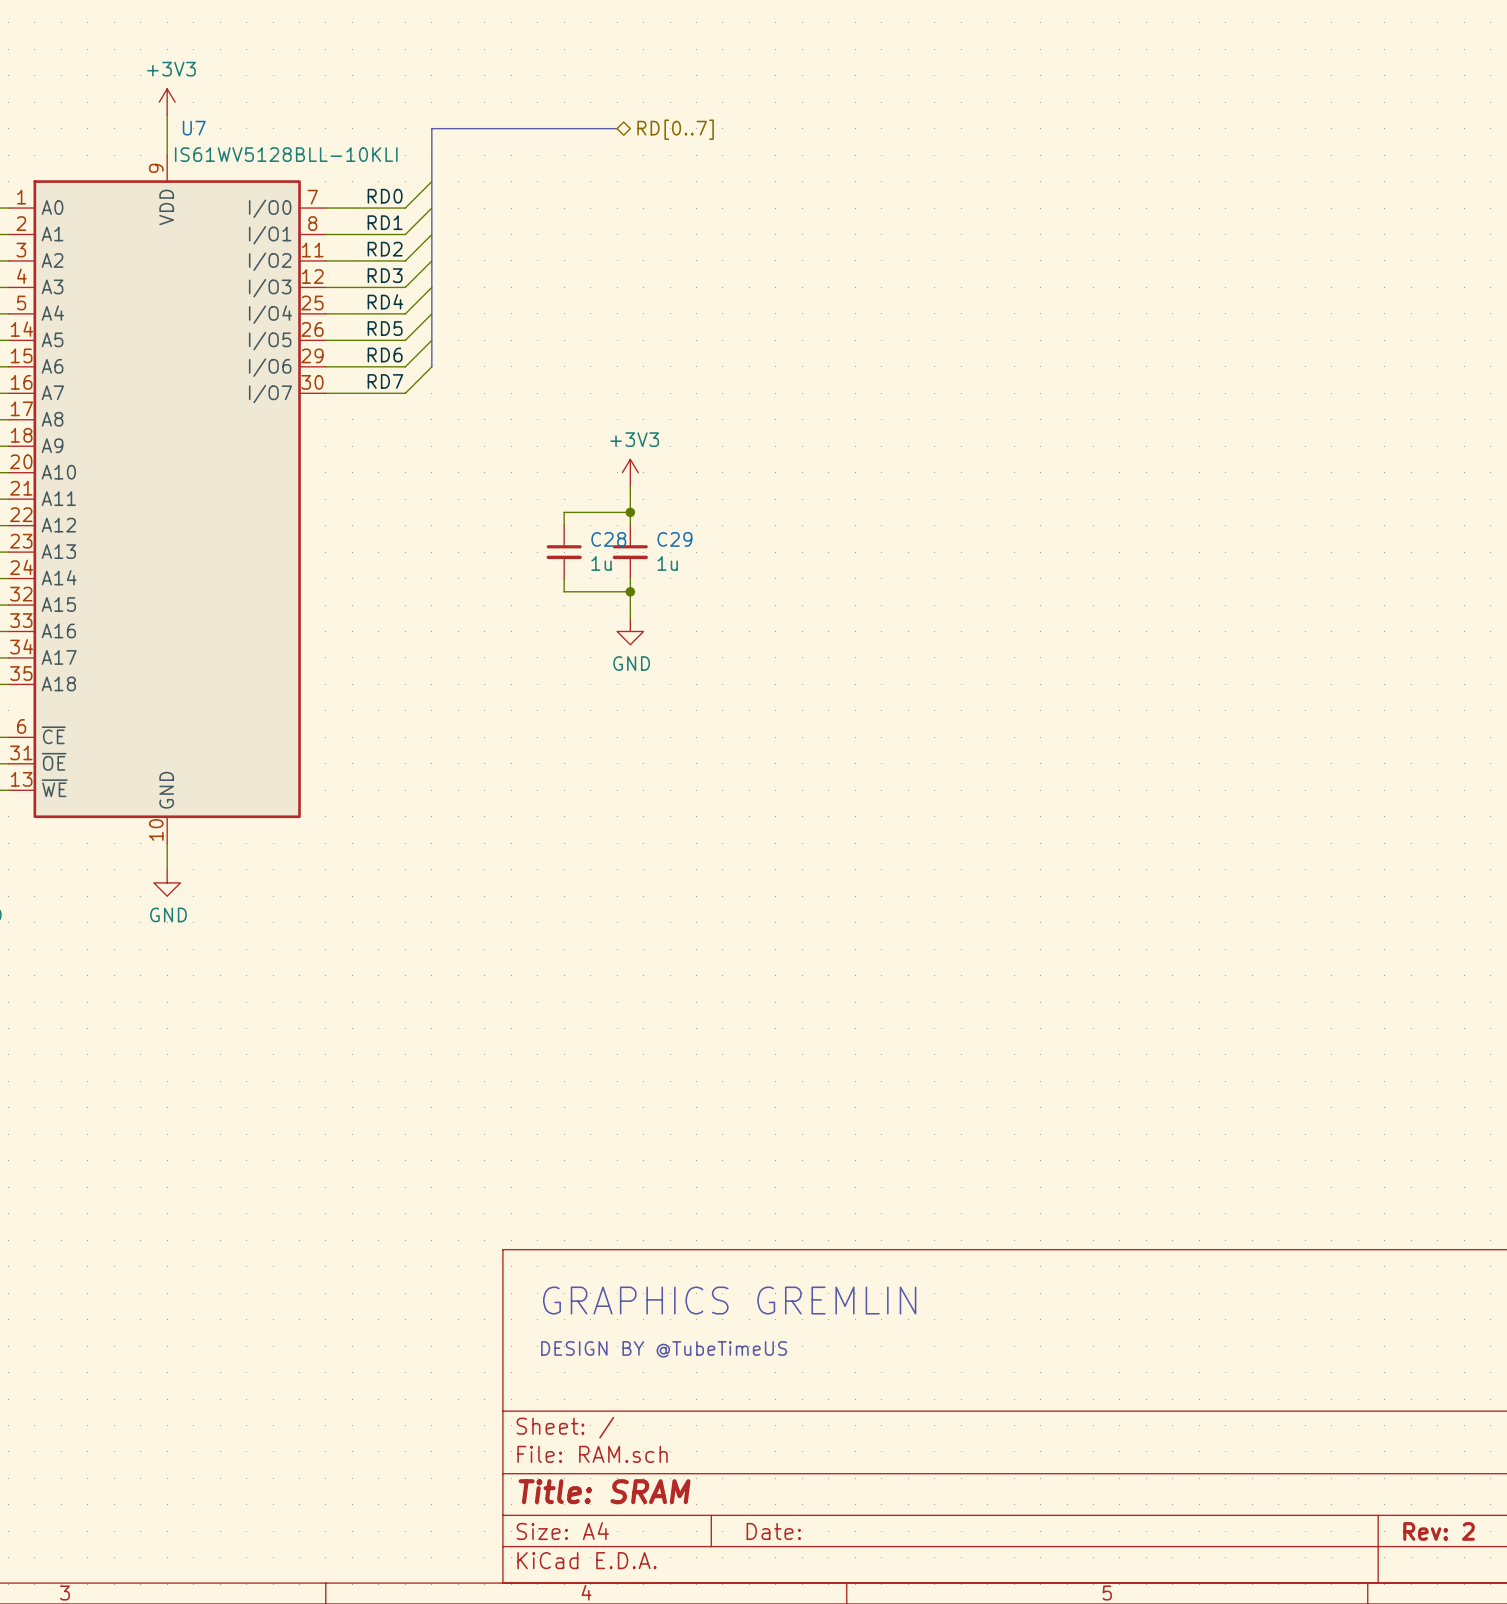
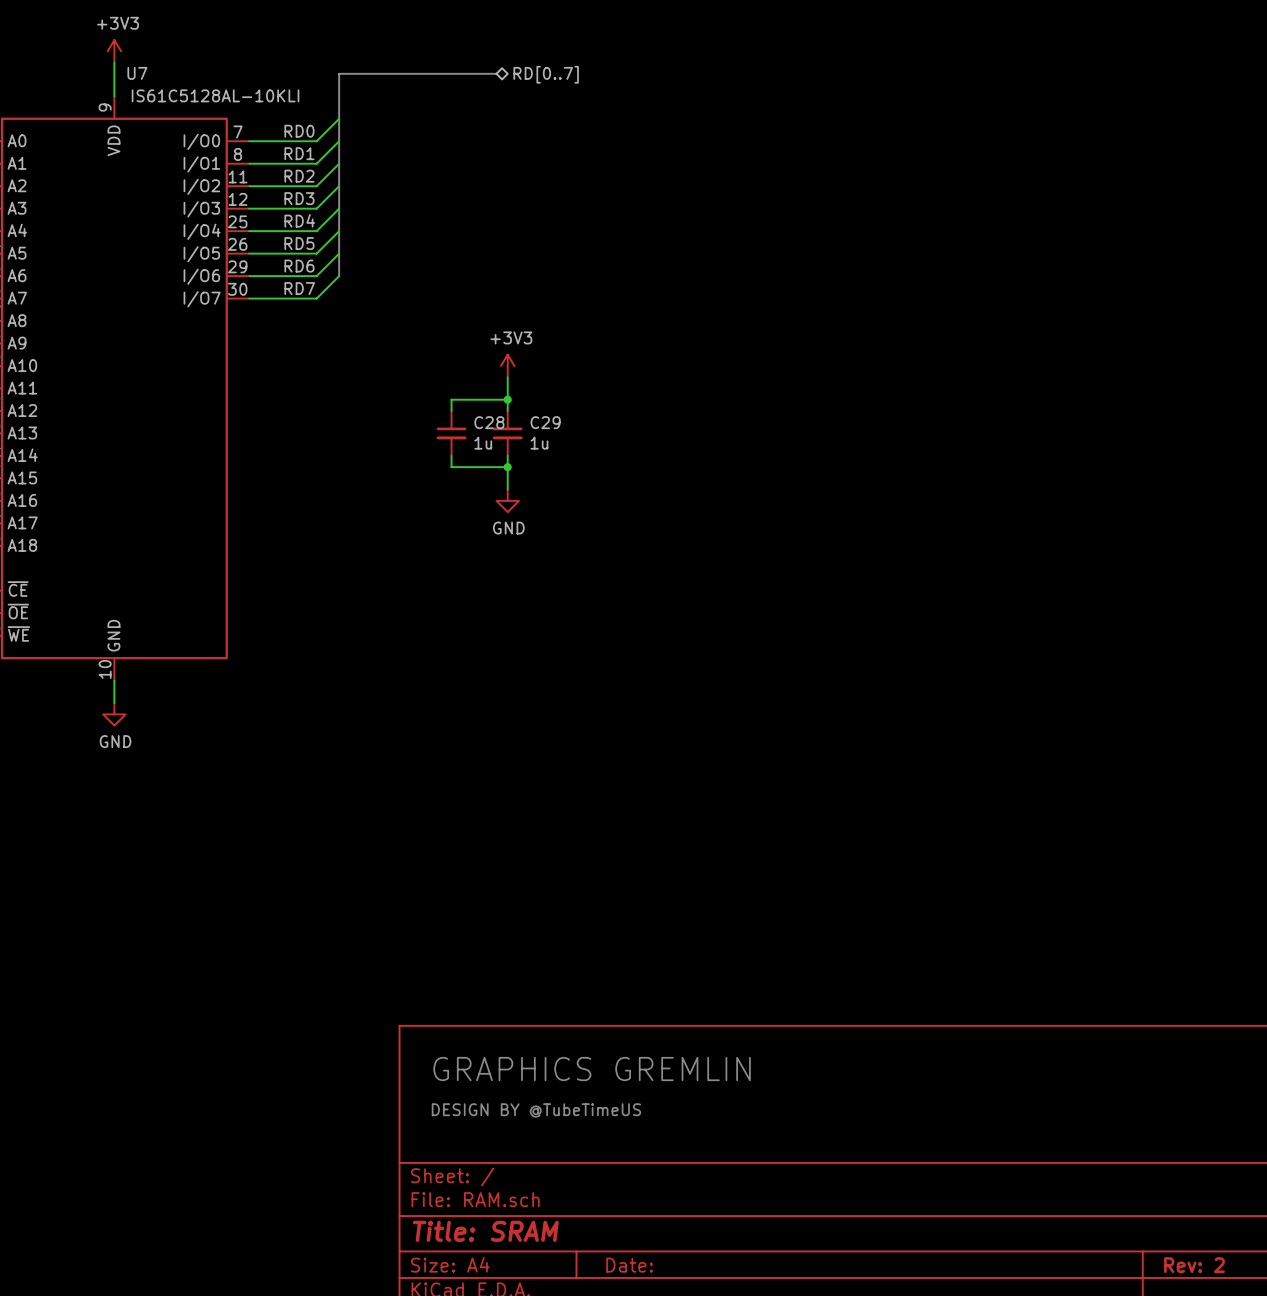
U7 value: IS61WV5128BLL-10KLI (286, 154) -> IS61C5128AL-10KLI (215, 95)

